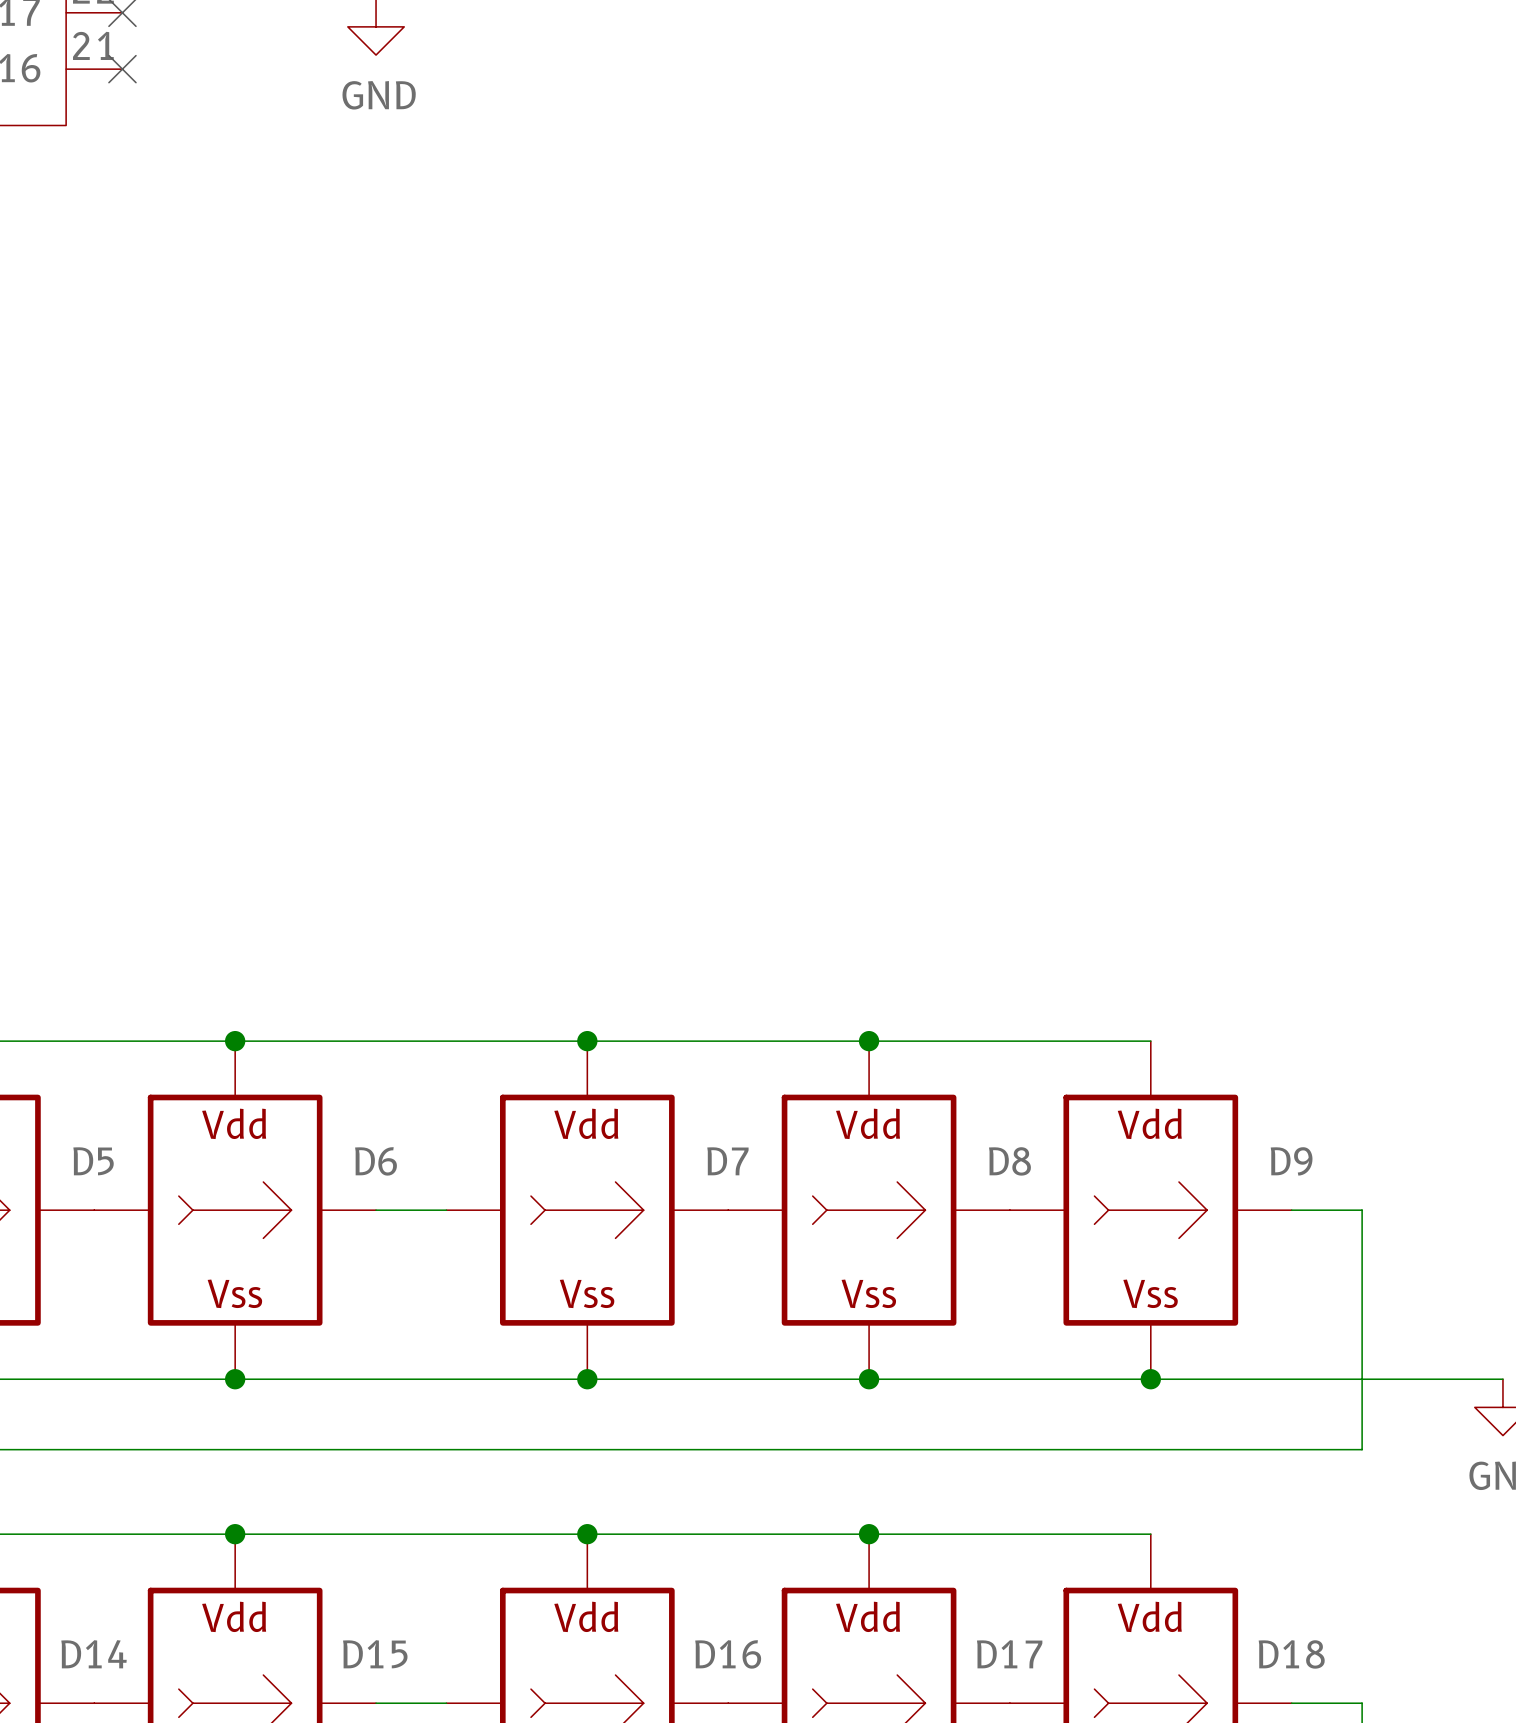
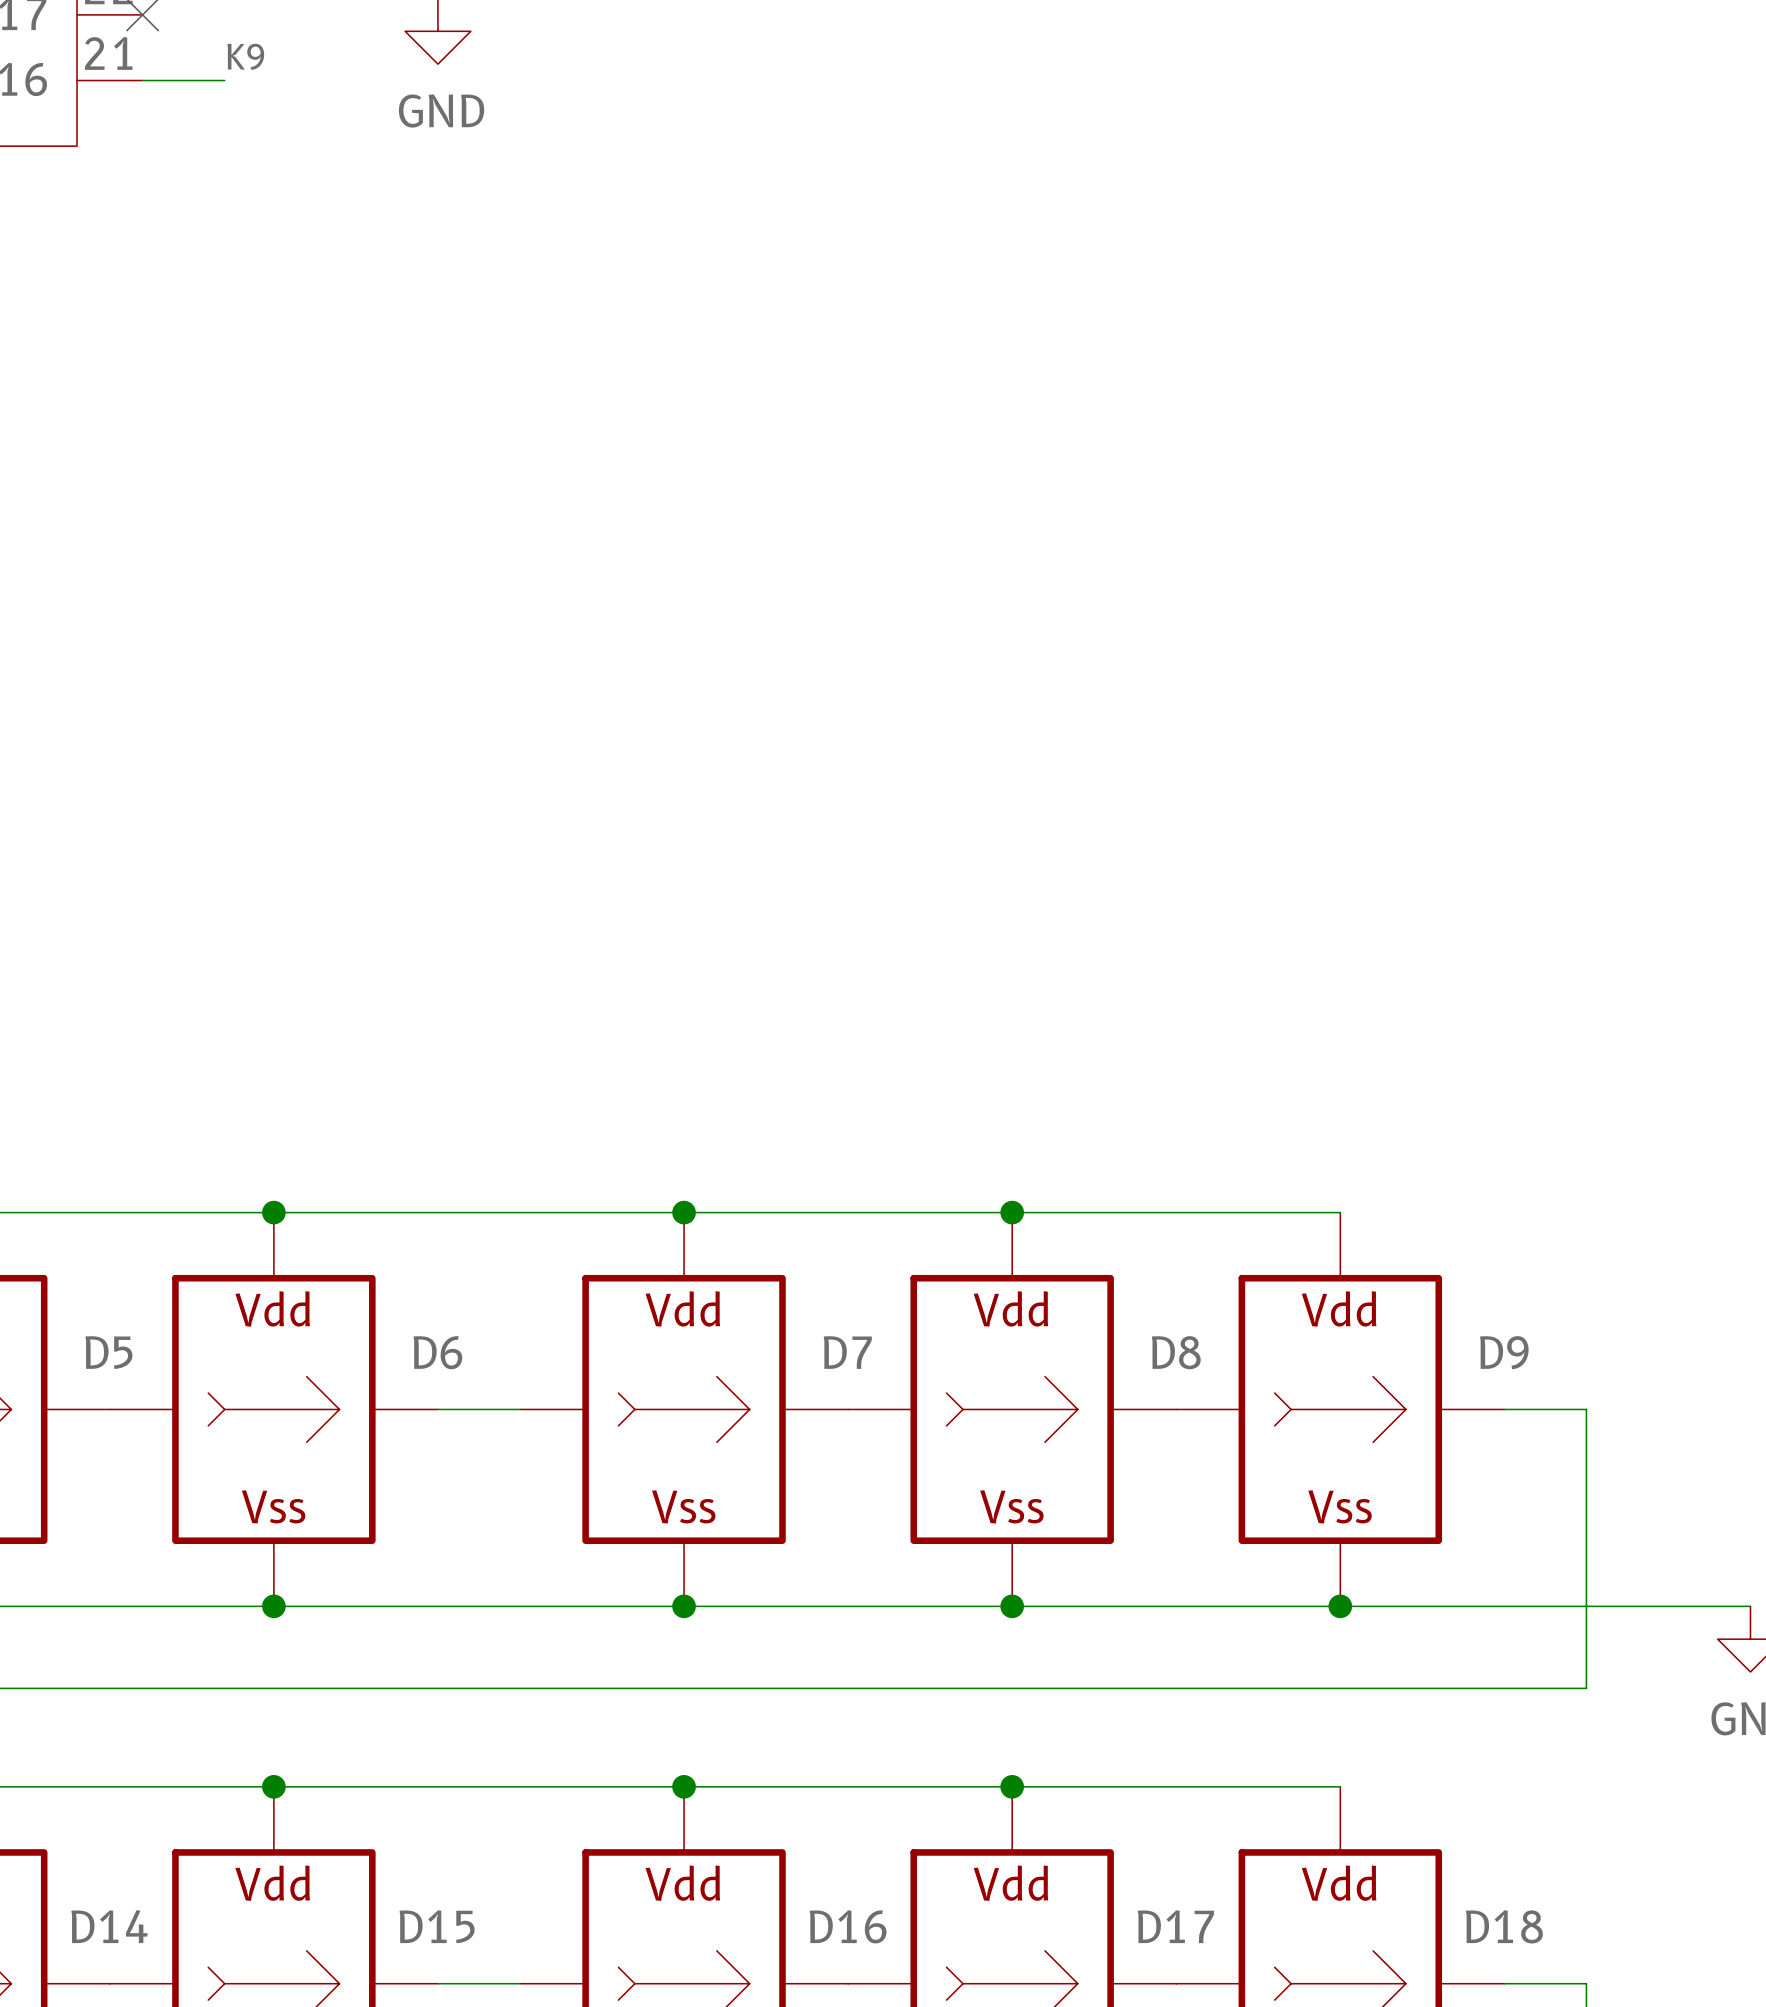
label: none -> K9 (245, 56)
wire: none -> (142, 80) (224, 80)
no-connect mark: (122, 69) -> none

